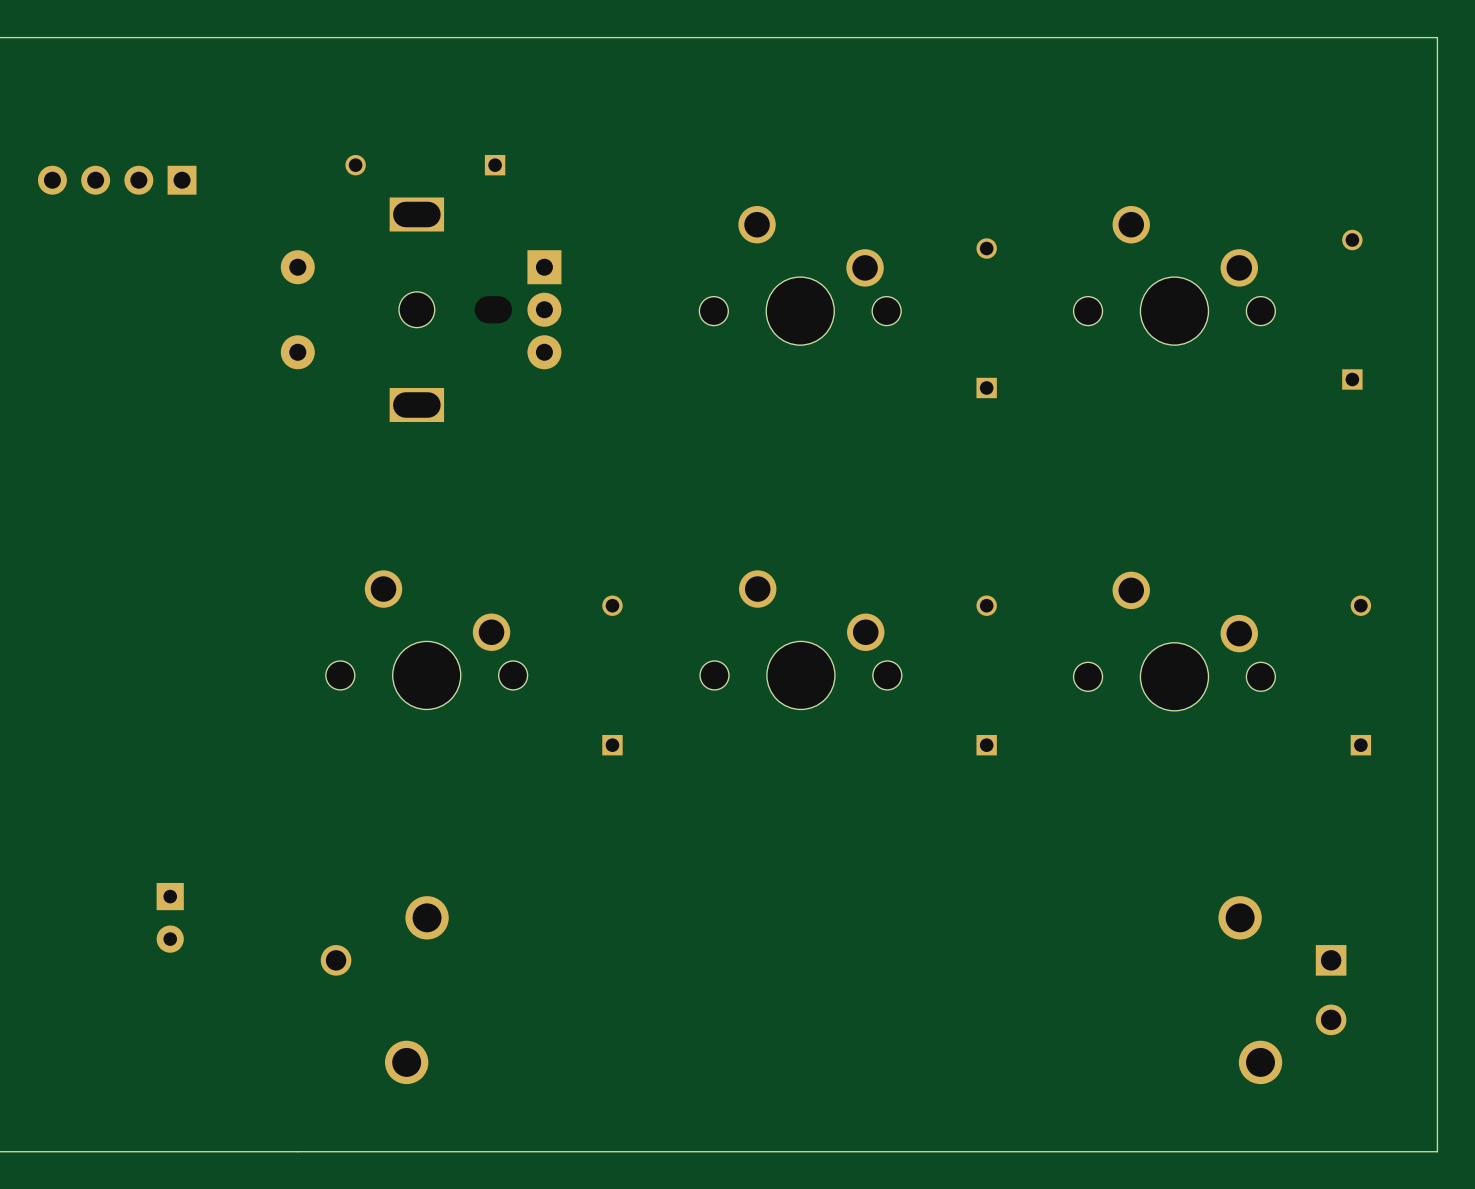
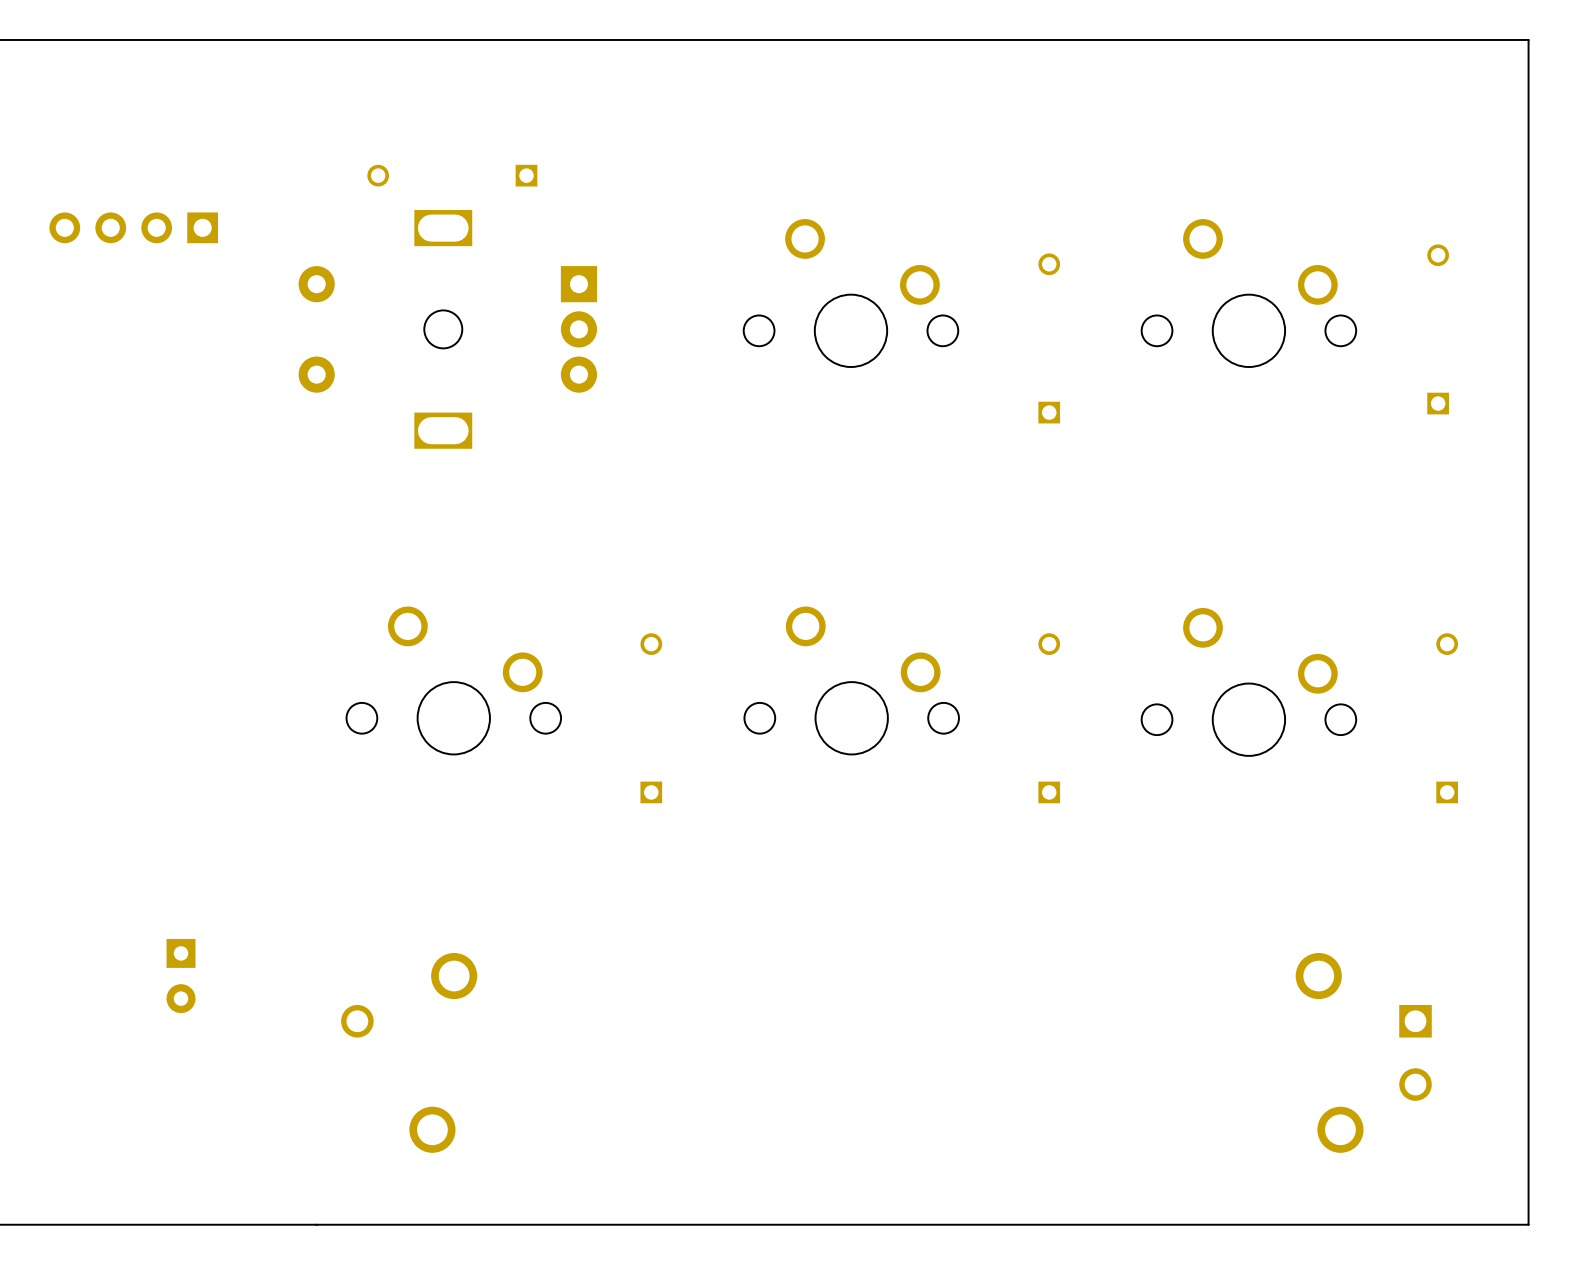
part position: (117, 180) -> (133, 227)

